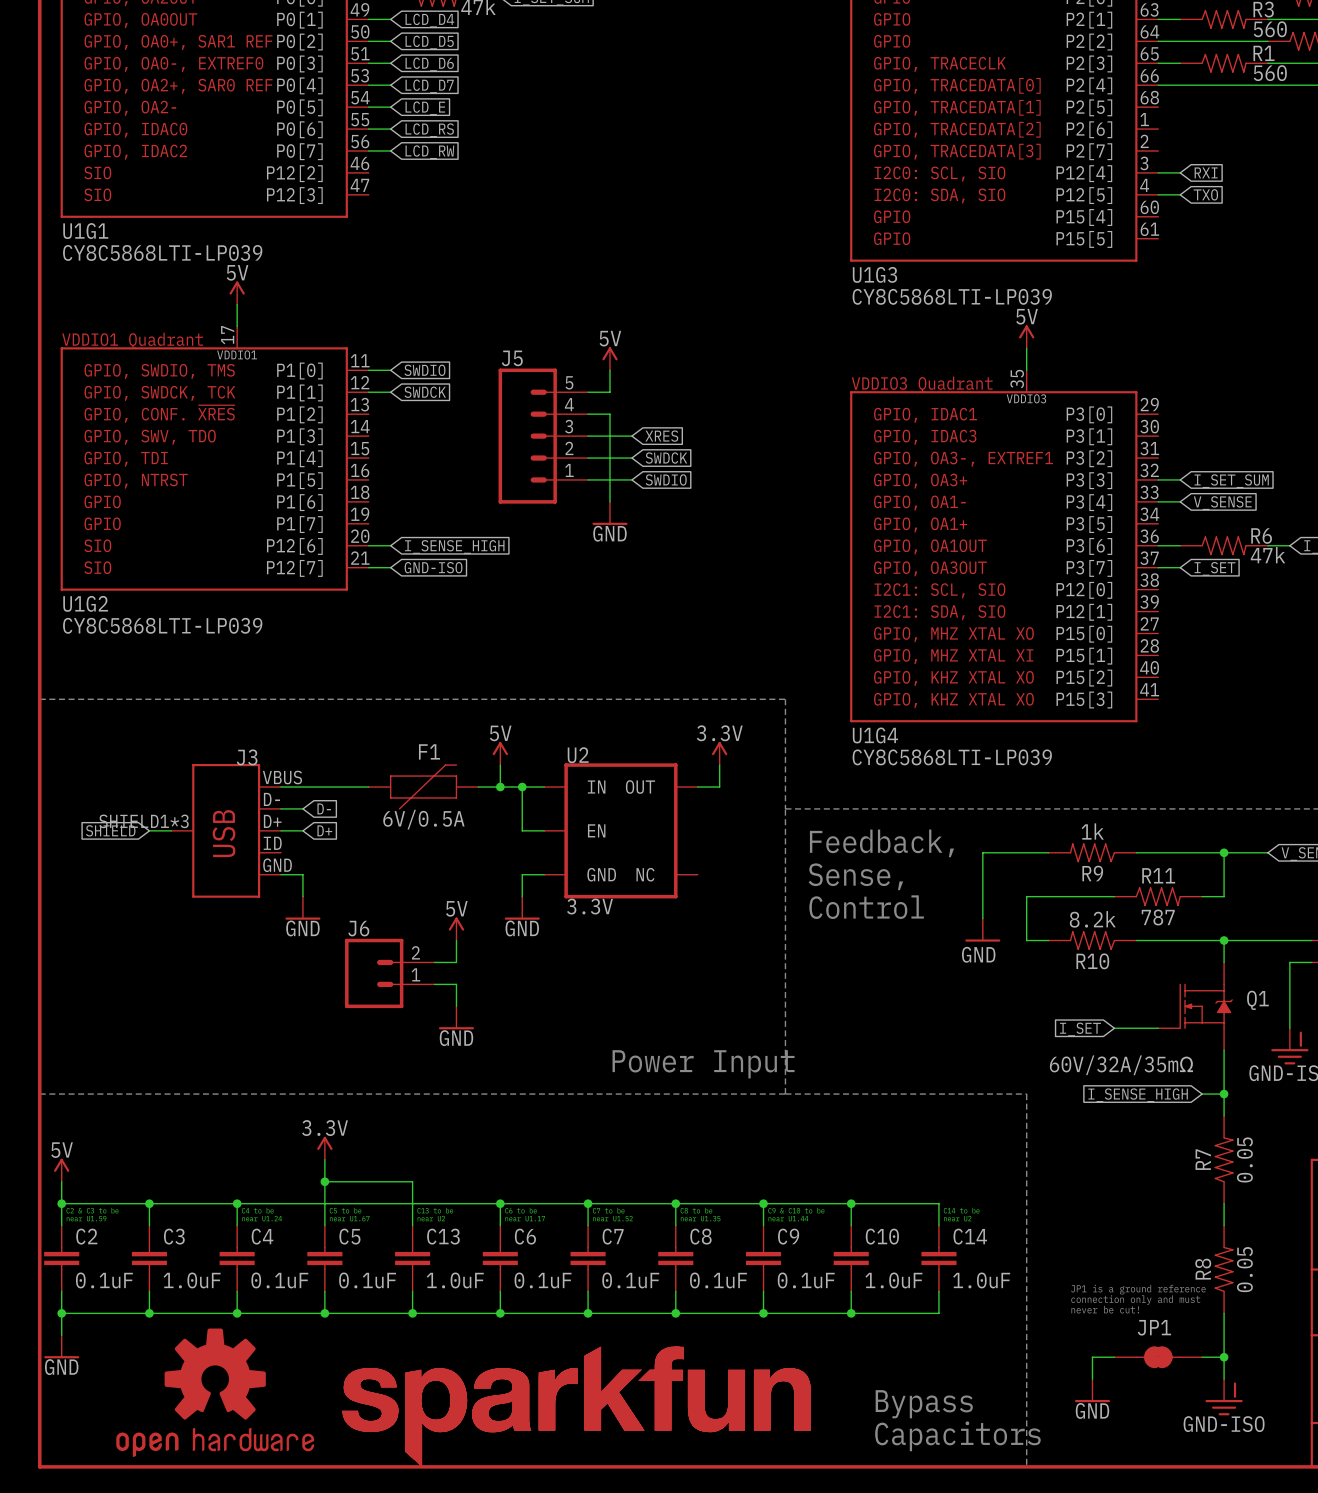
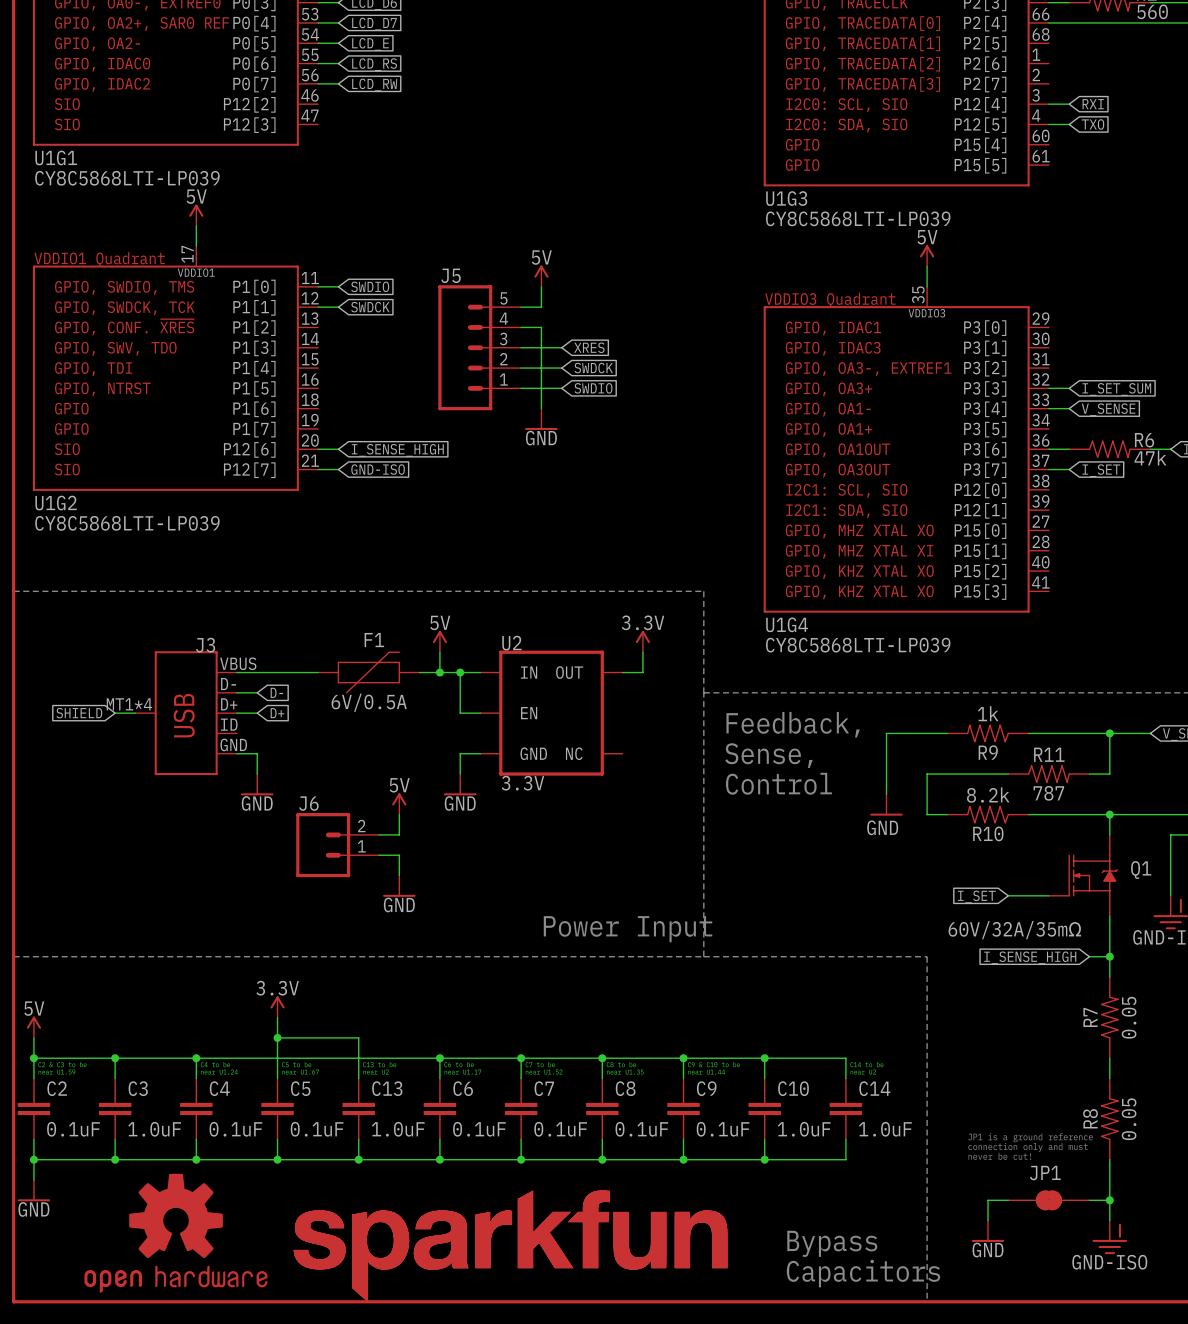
J3 pin number: SHIELD1*3 (143, 821) -> MT1*4 (129, 704)

